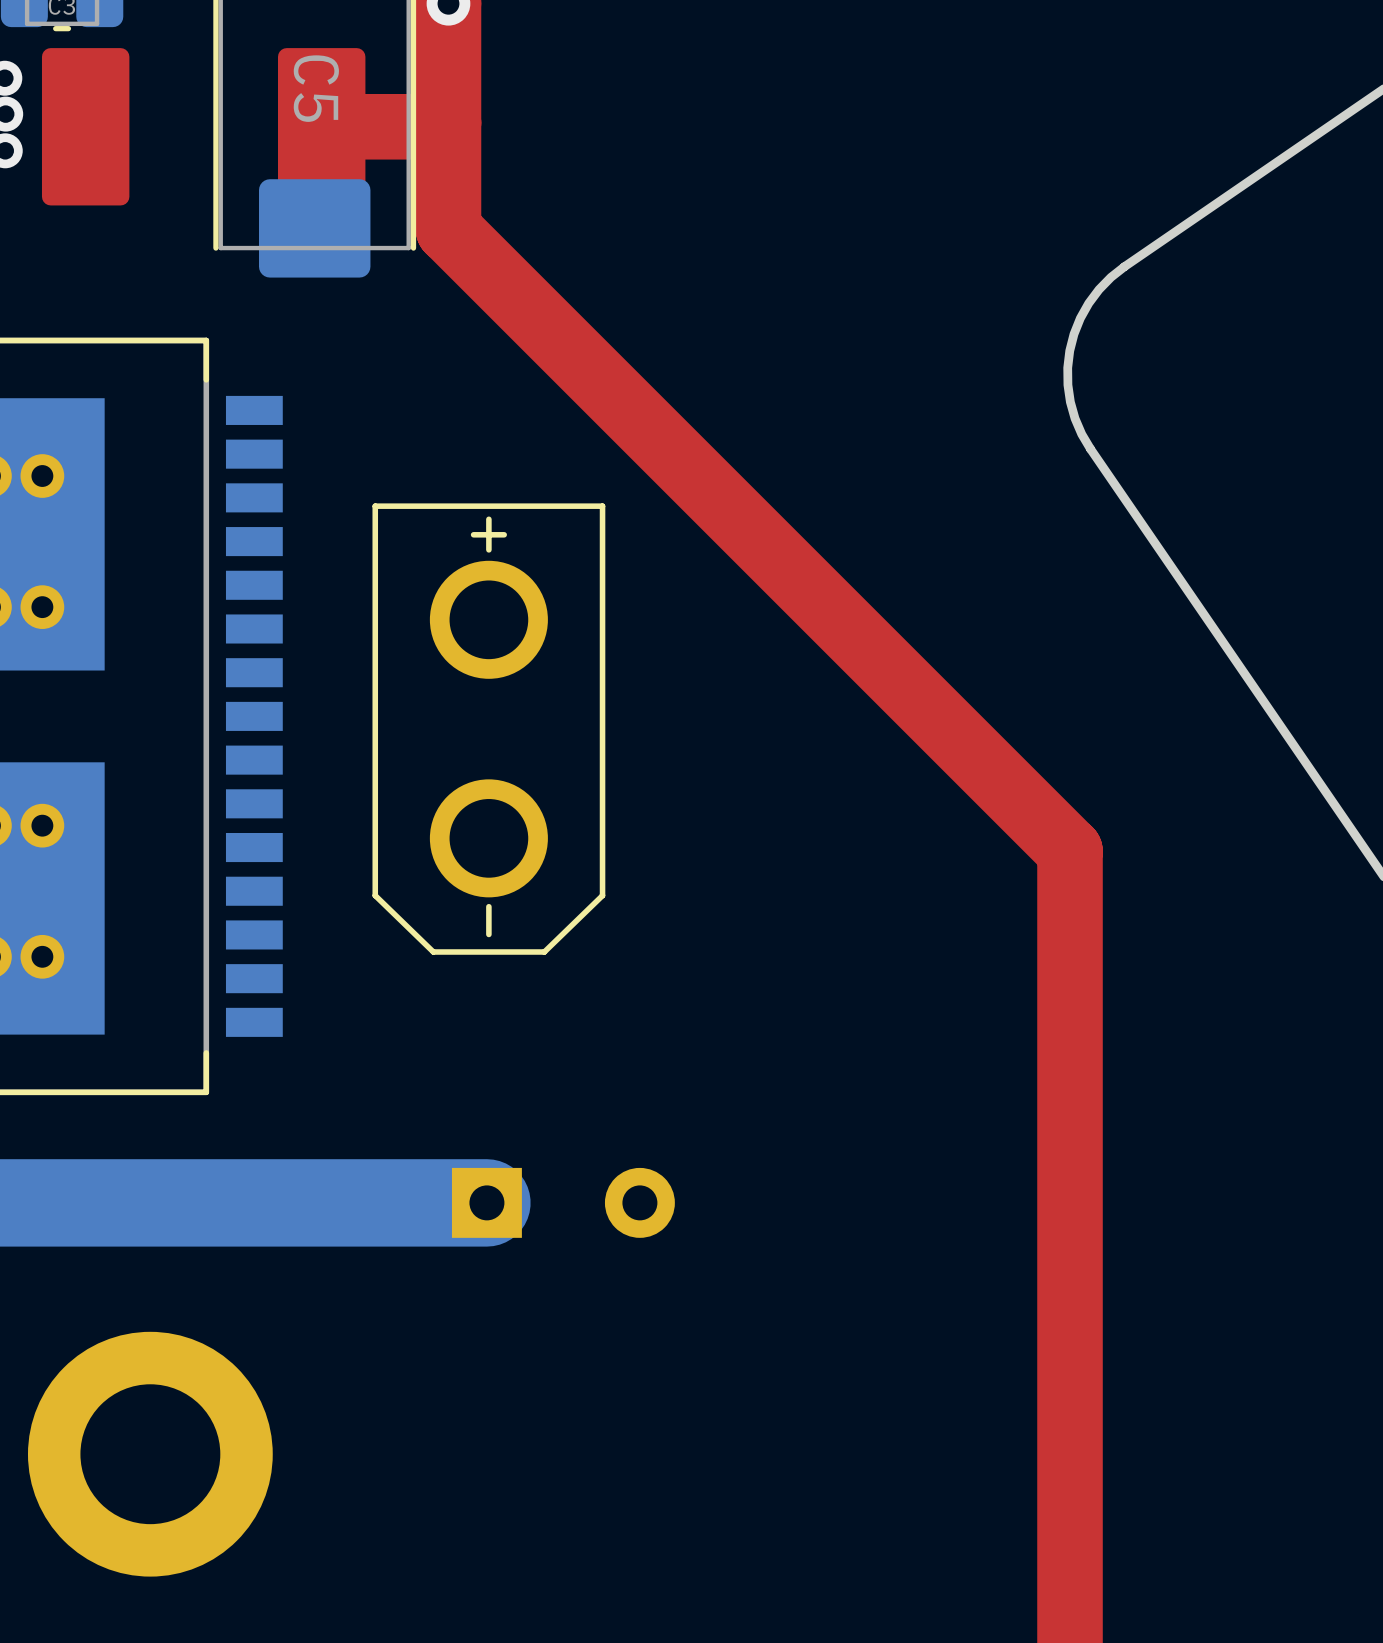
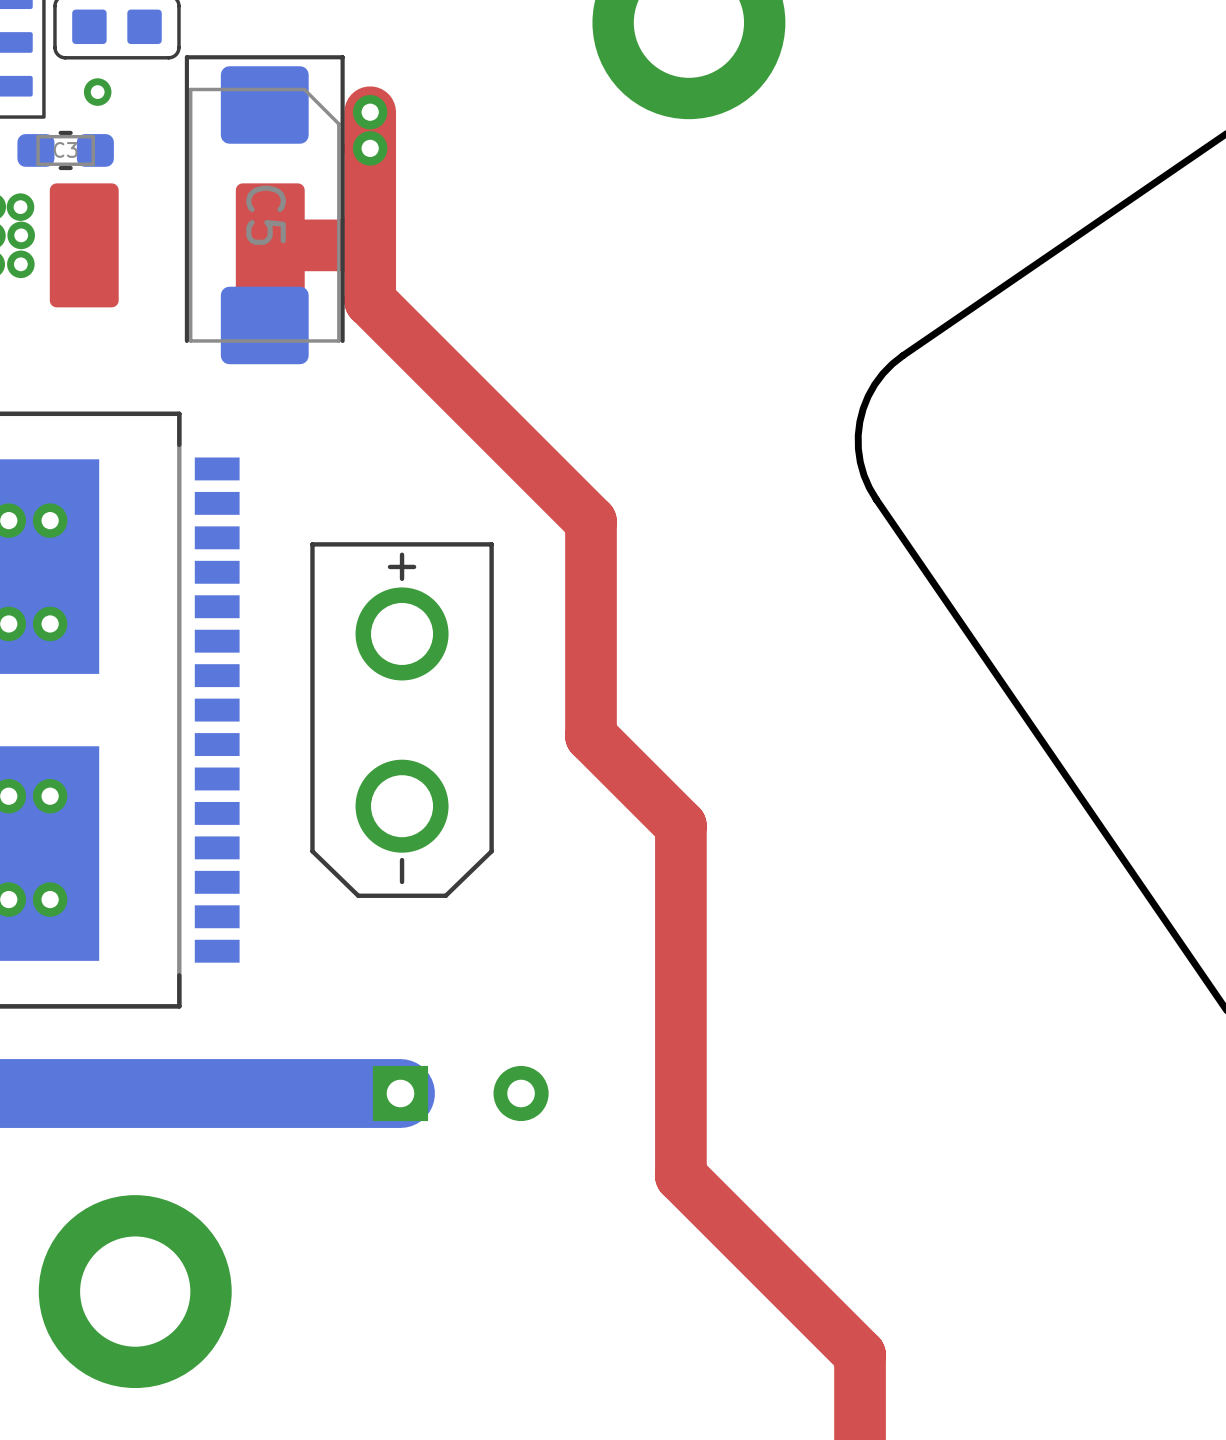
top track: (448, 197) (448, 229) (1070, 851) (1070, 1534) -> (370, 300) (590, 521) (590, 735) (680, 825) (680, 1175) (860, 1354)

